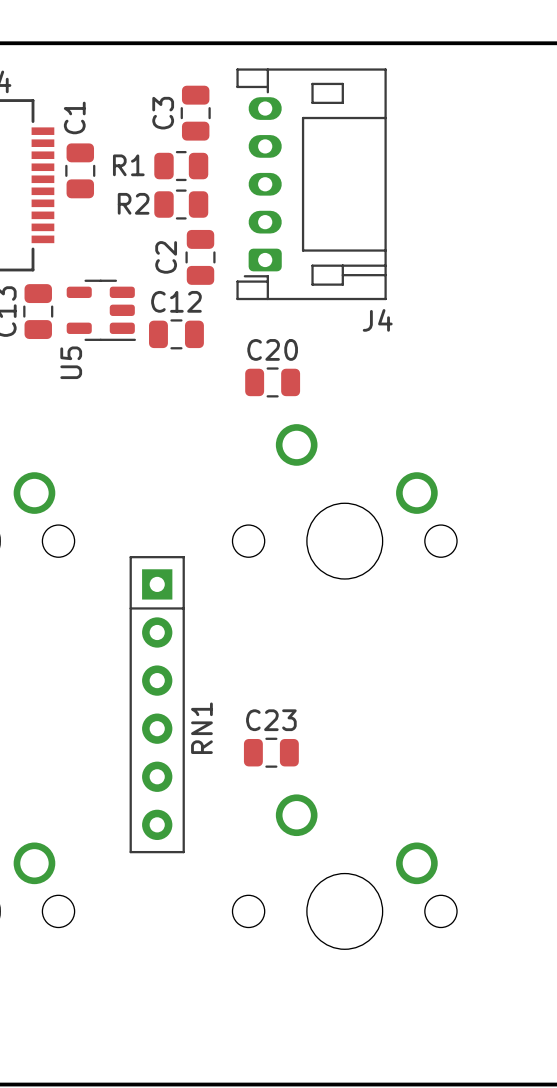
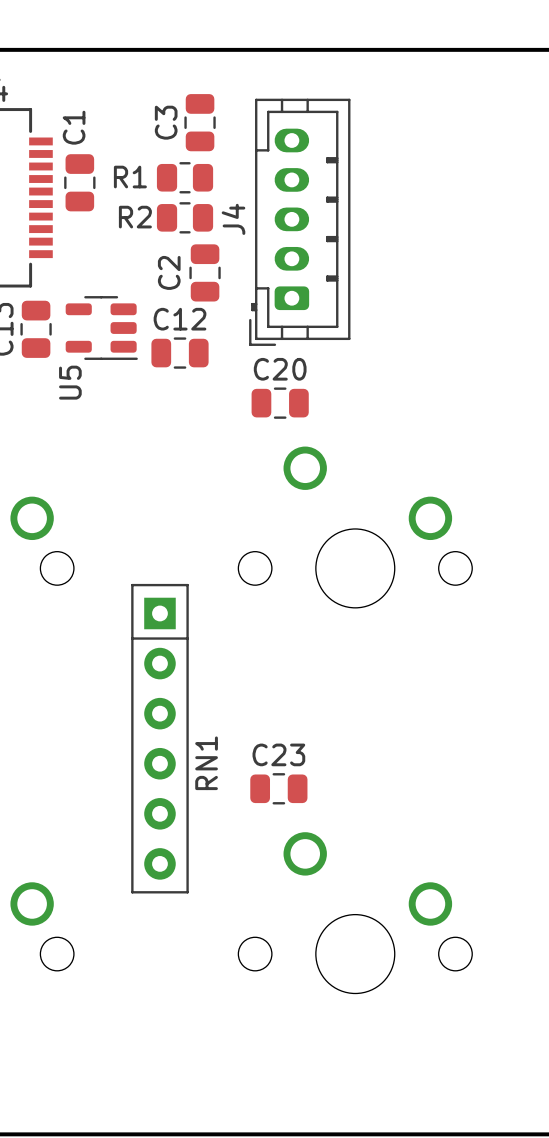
J4 footprint: [236, 68, 387, 301] -> [249, 98, 351, 346]
J4 name position: J4 (377, 320) -> J4 (233, 219)

